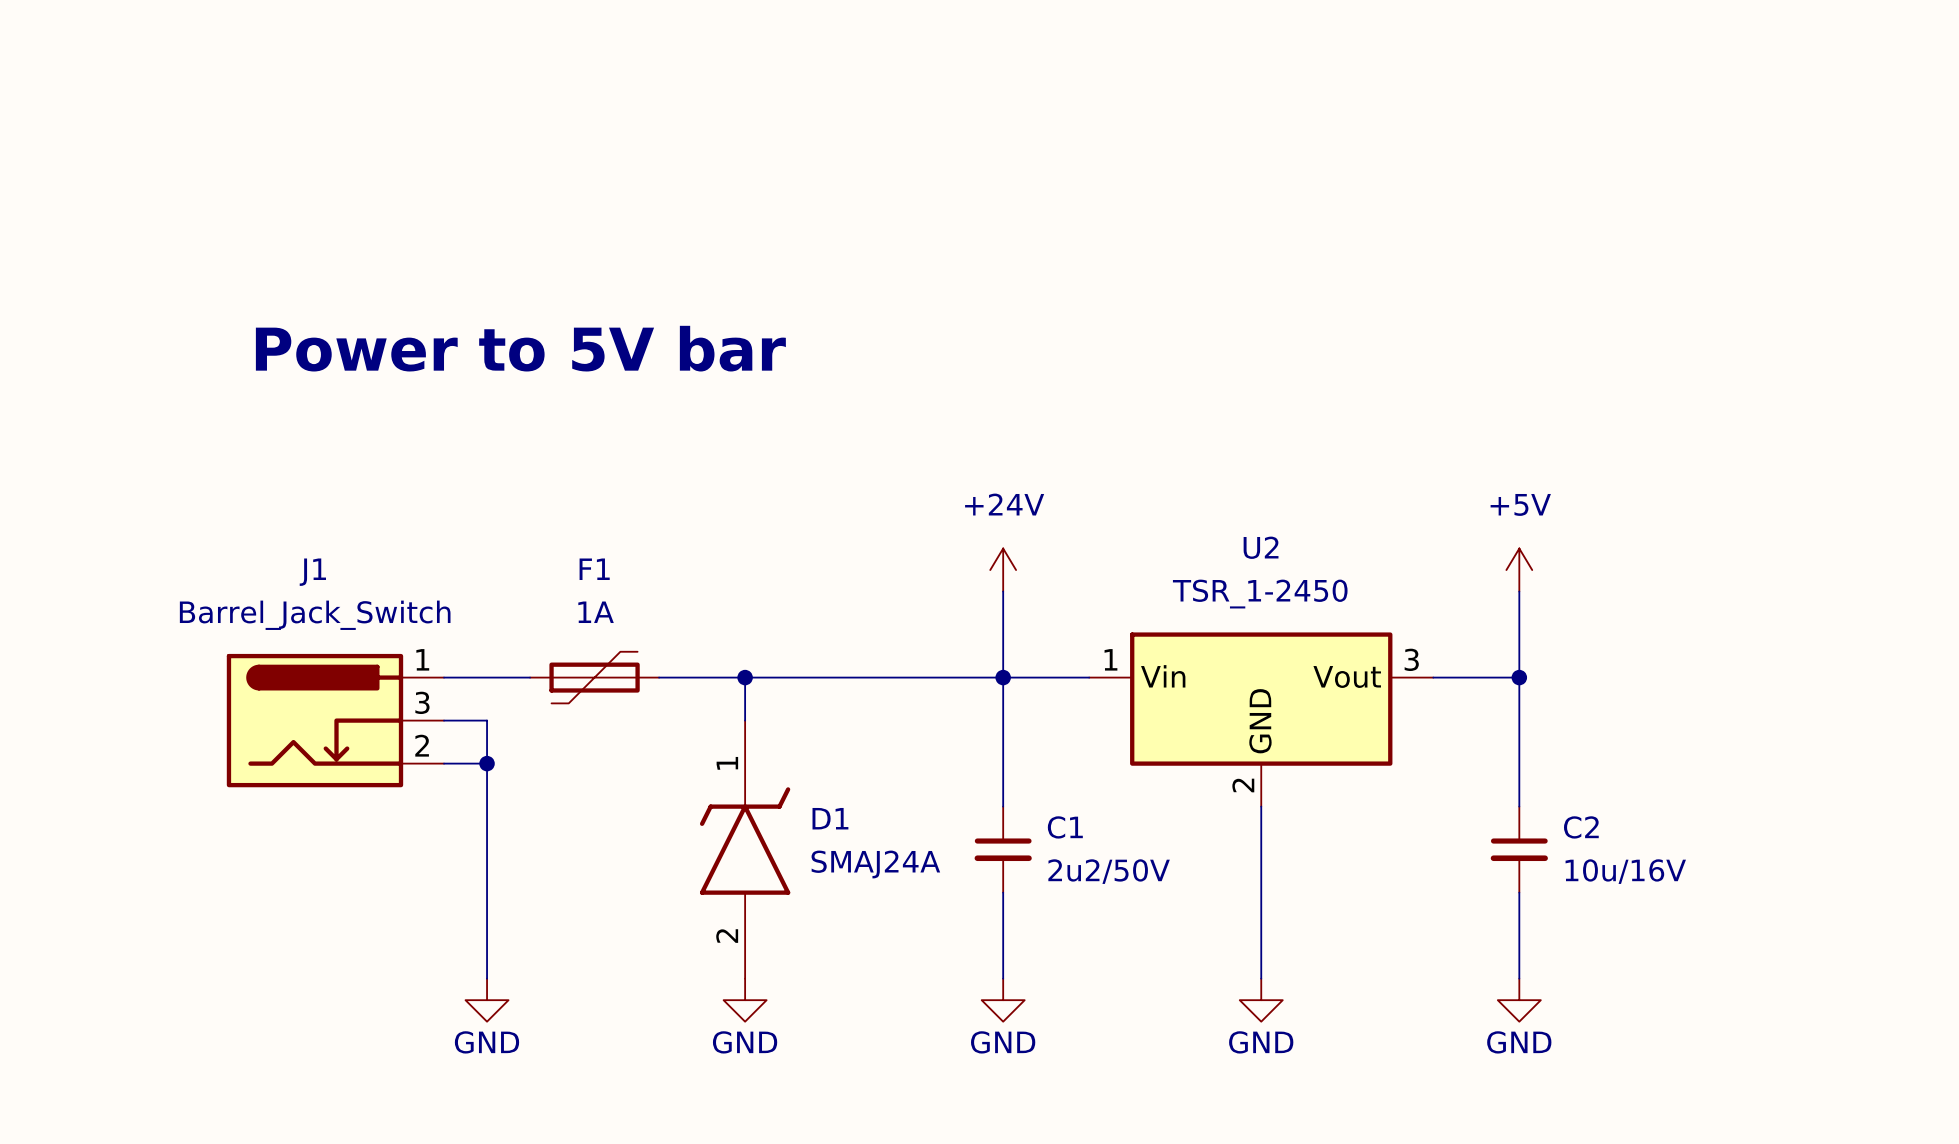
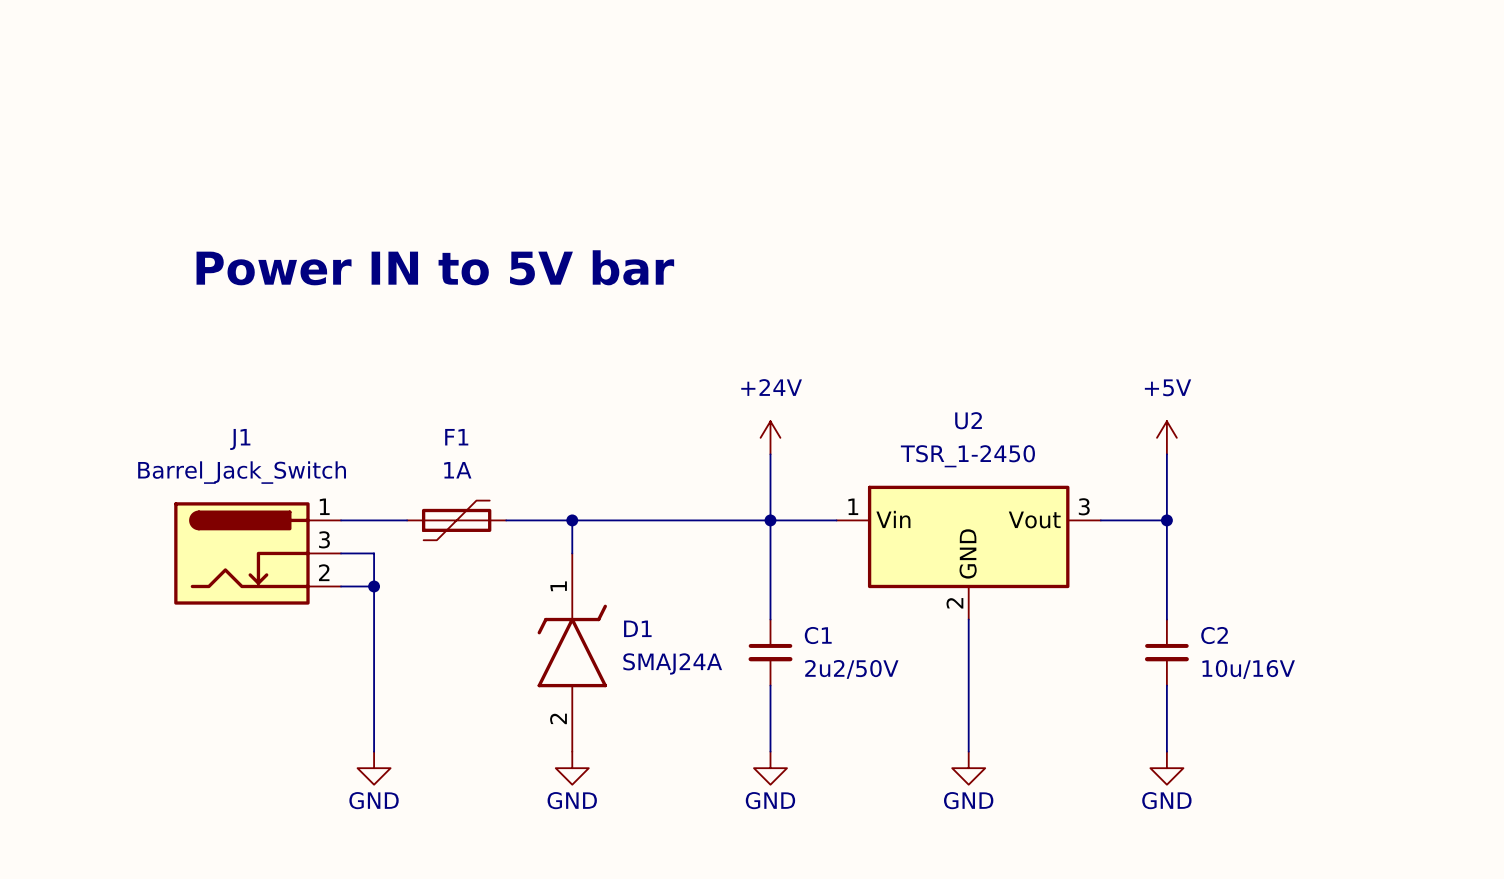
text: Power to 5V bar (520, 348) -> Power IN to 5V bar (435, 267)

